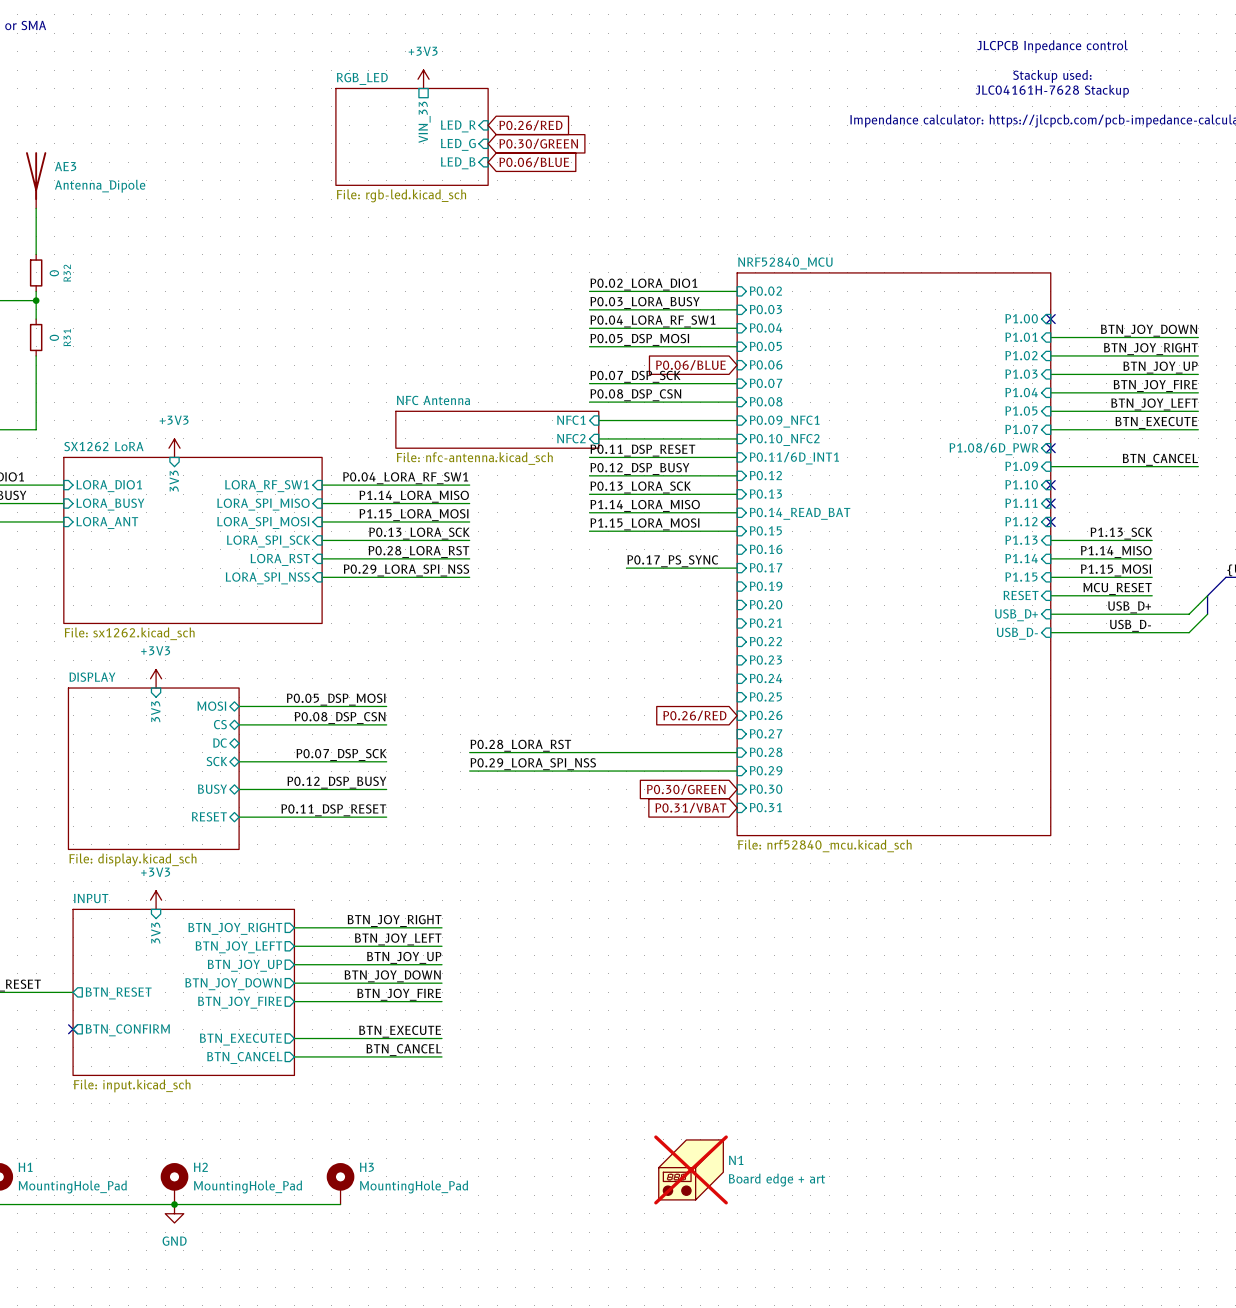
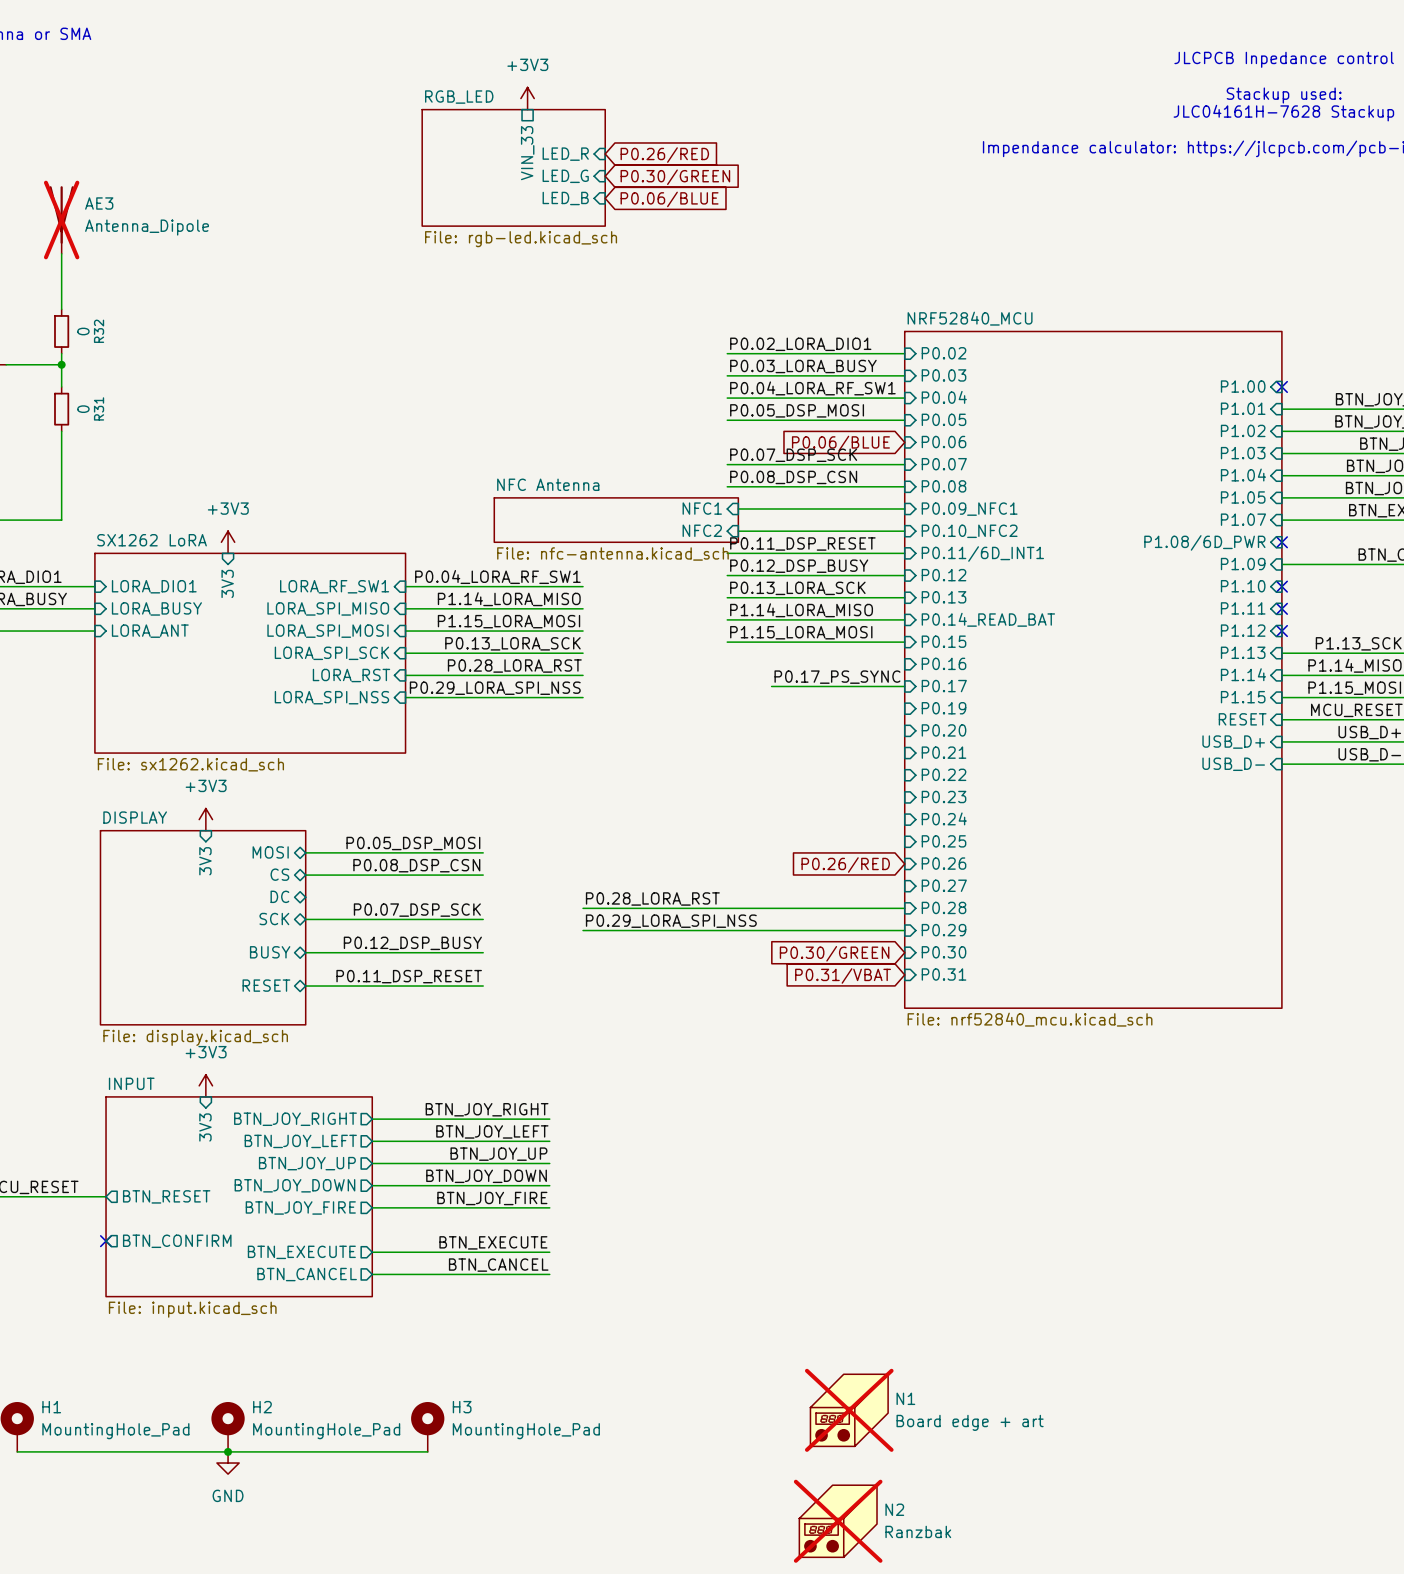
AE3 do-not-place cross: none -> (61, 220)
N2: none -> Ranzbak (838, 1521)

